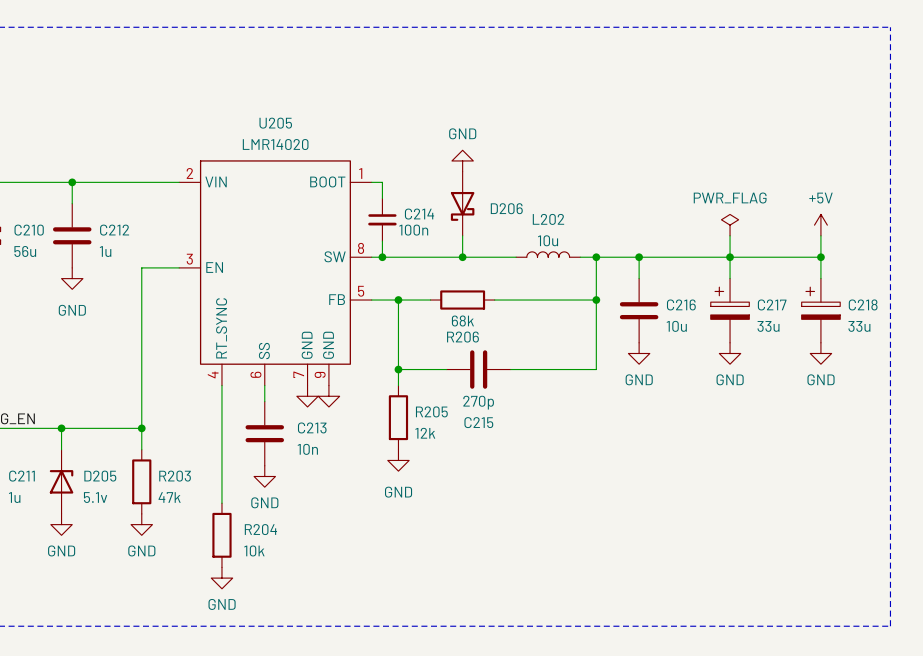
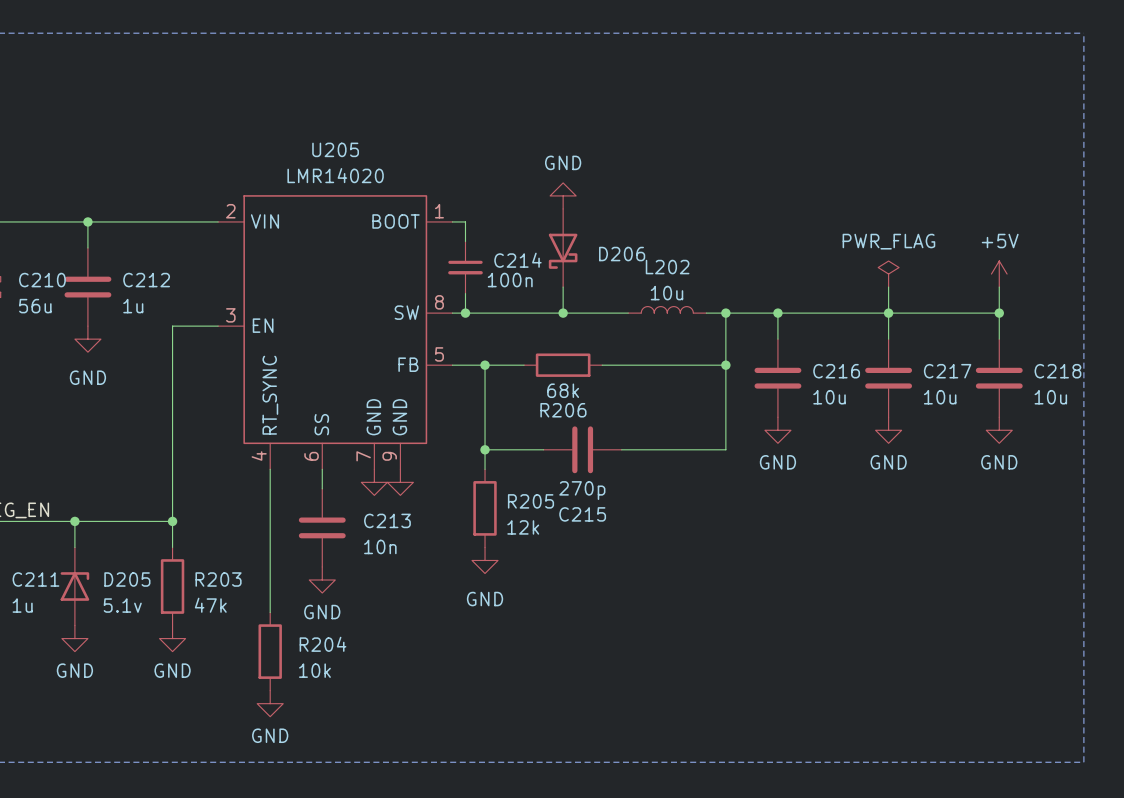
C217 symbol: [710, 278, 750, 343] -> [865, 339, 913, 418]
C218 symbol: [801, 278, 841, 343] -> [975, 339, 1023, 418]
C217 value: 33u (768, 326) -> 10u (940, 397)
C218 value: 33u (859, 326) -> 10u (1050, 397)

